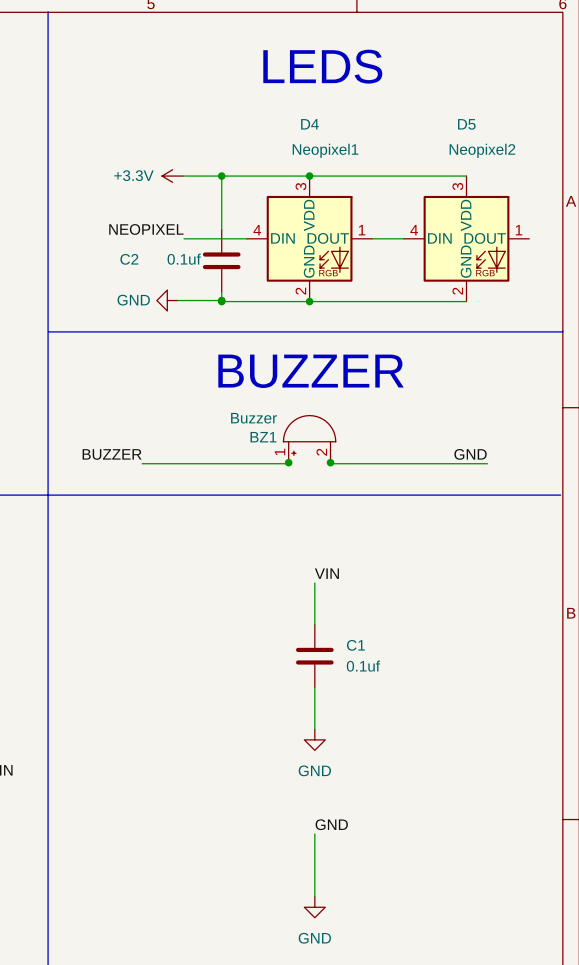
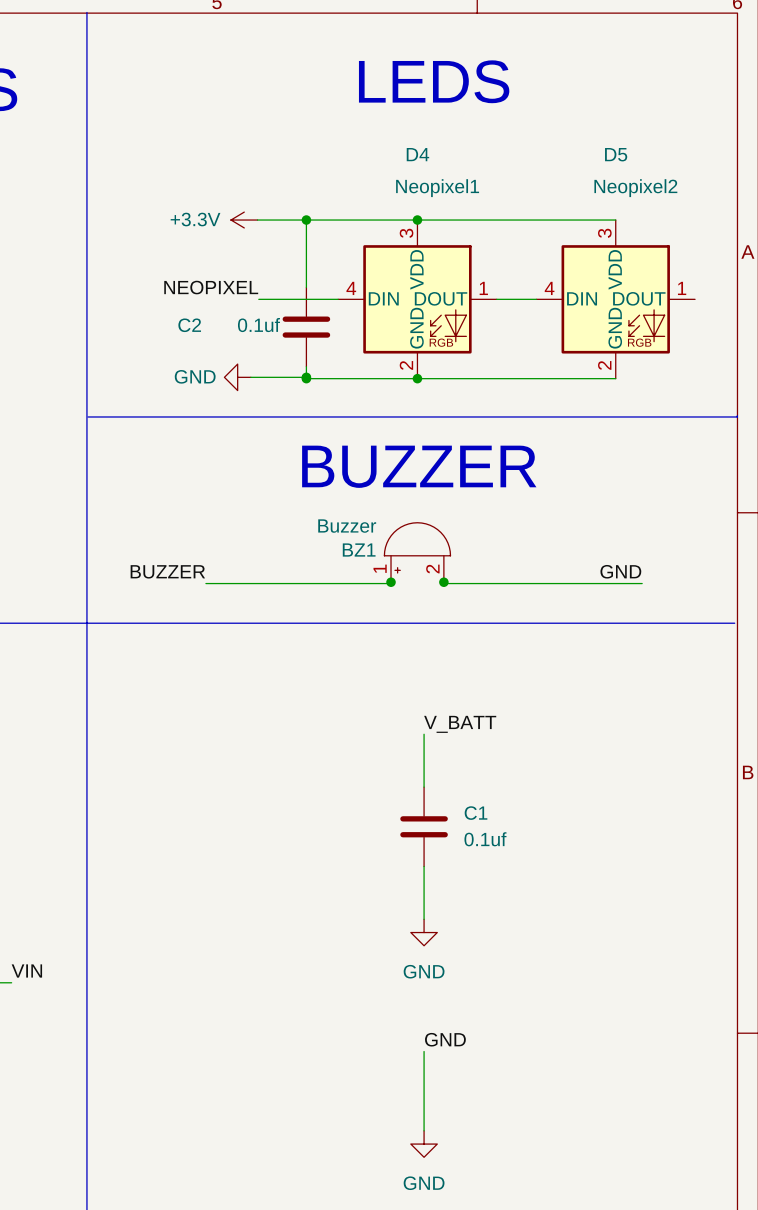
label: VIN (326, 573) -> V_BATT (460, 724)

